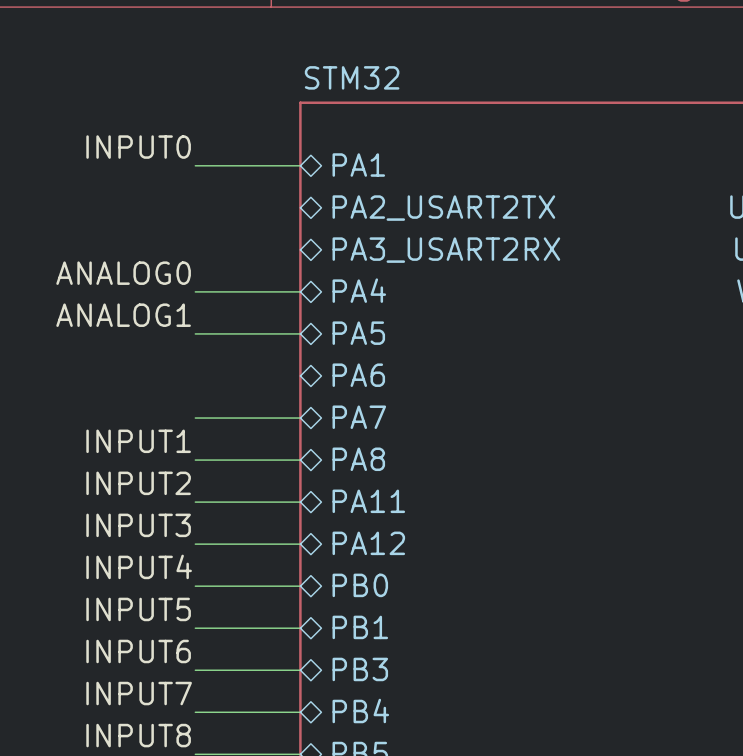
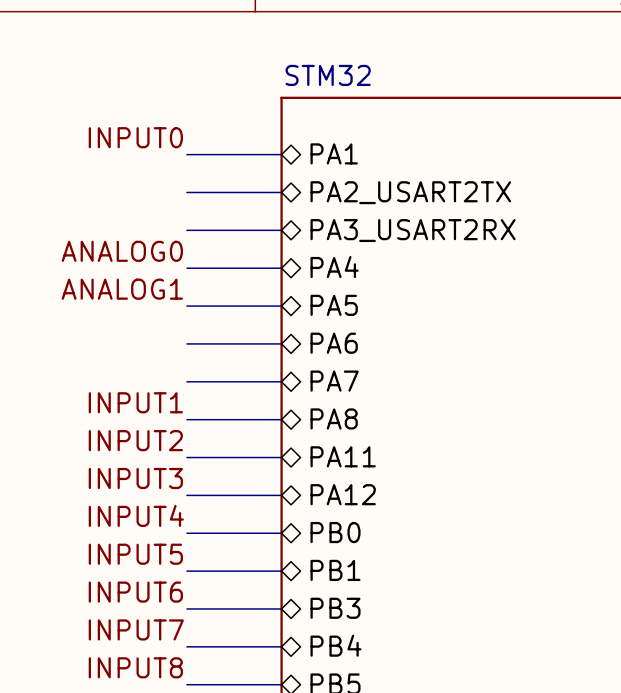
wire: none -> (186, 192) (281, 192)
wire: none -> (186, 230) (281, 230)
wire: none -> (186, 343) (281, 343)

